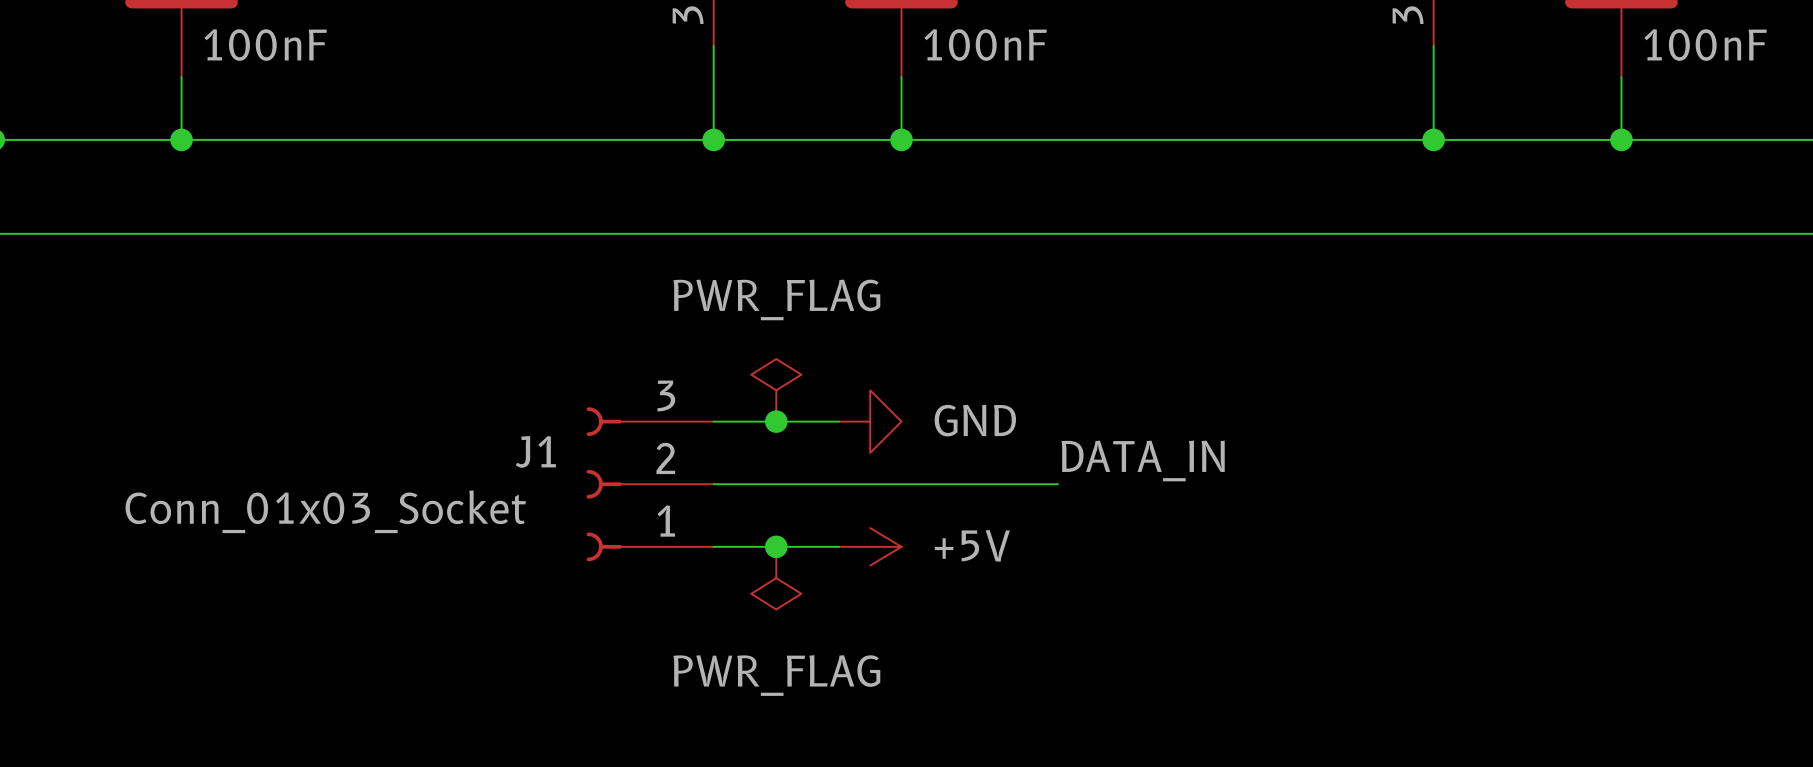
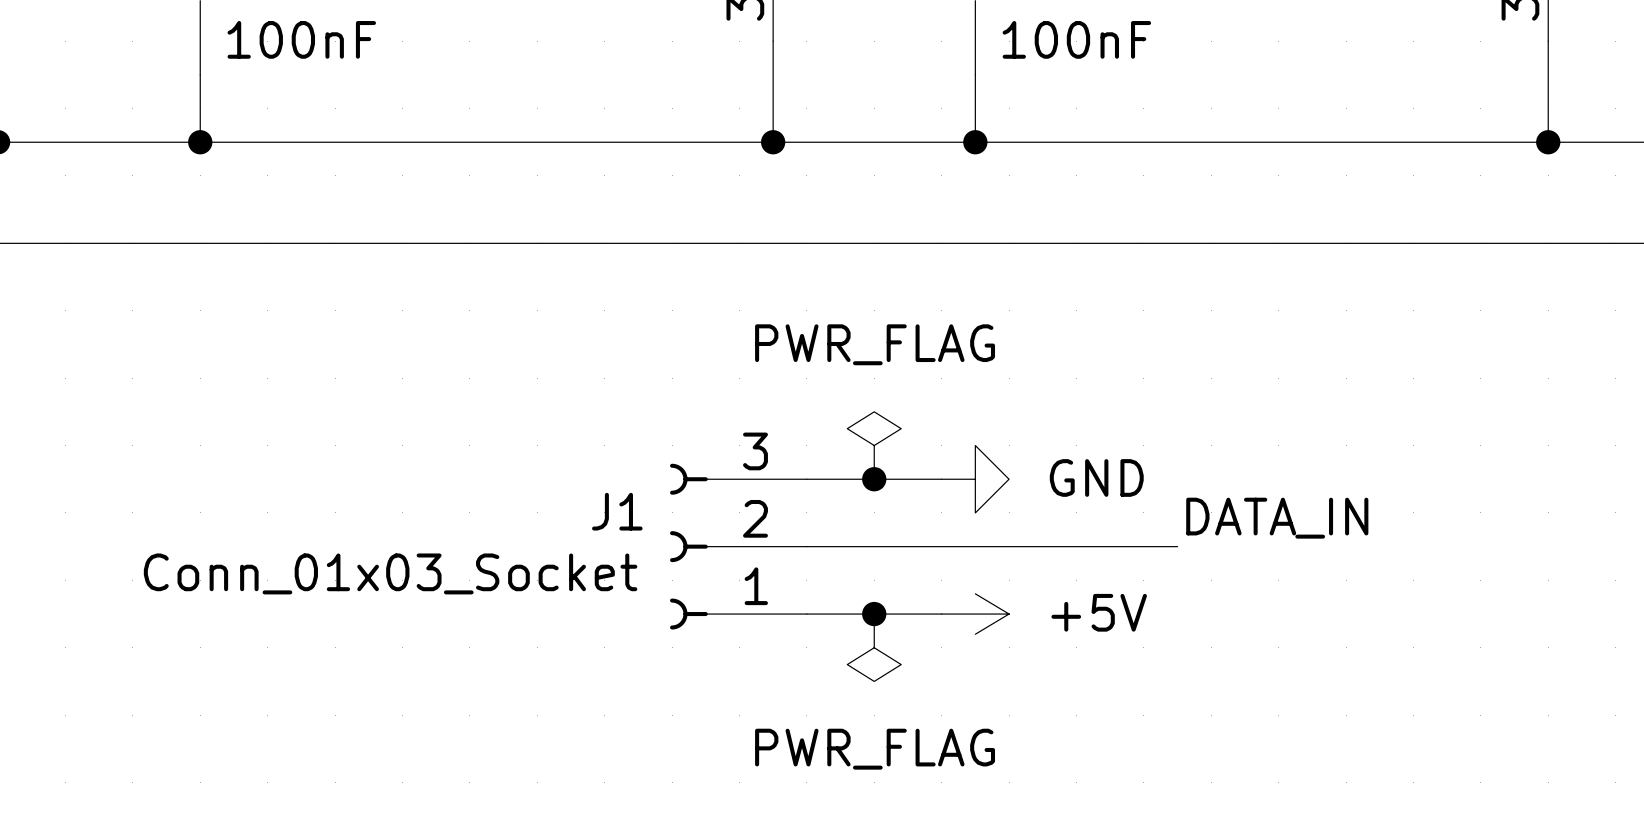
power symbol position: PWR_FLAG (776, 390) -> PWR_FLAG (874, 445)
wire: (713, 421) (838, 421) -> (806, 479) (941, 479)
junction position: (776, 421) -> (874, 479)
power symbol position: GND (870, 421) -> GND (975, 479)
label position: DATA_IN (1143, 460) -> DATA_IN (1277, 518)
J1 position: (650, 484) -> (738, 546)
wire: (713, 484) (1058, 484) -> (806, 546) (1177, 546)
wire: (713, 546) (838, 546) -> (806, 614) (941, 614)
junction position: (776, 546) -> (874, 614)
power symbol position: +5V (870, 546) -> +5V (975, 614)
power symbol position: PWR_FLAG (776, 578) -> PWR_FLAG (874, 647)

